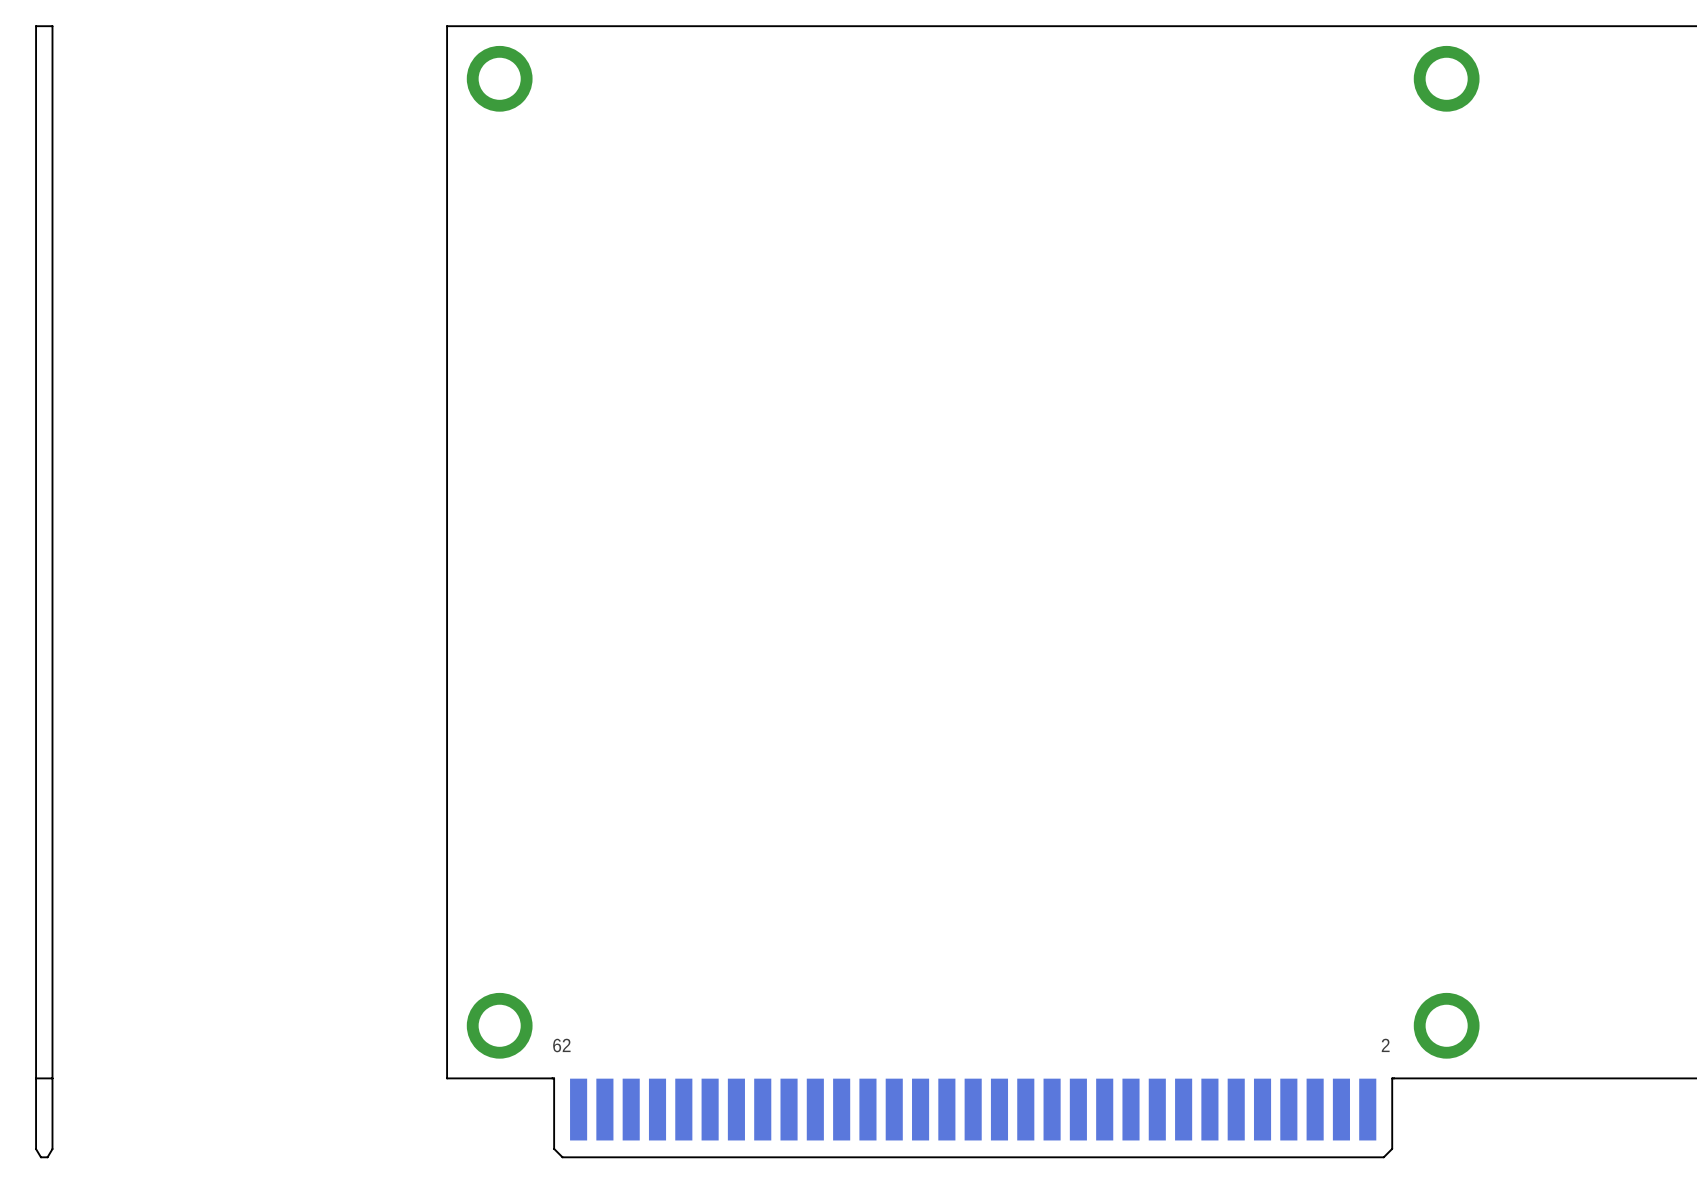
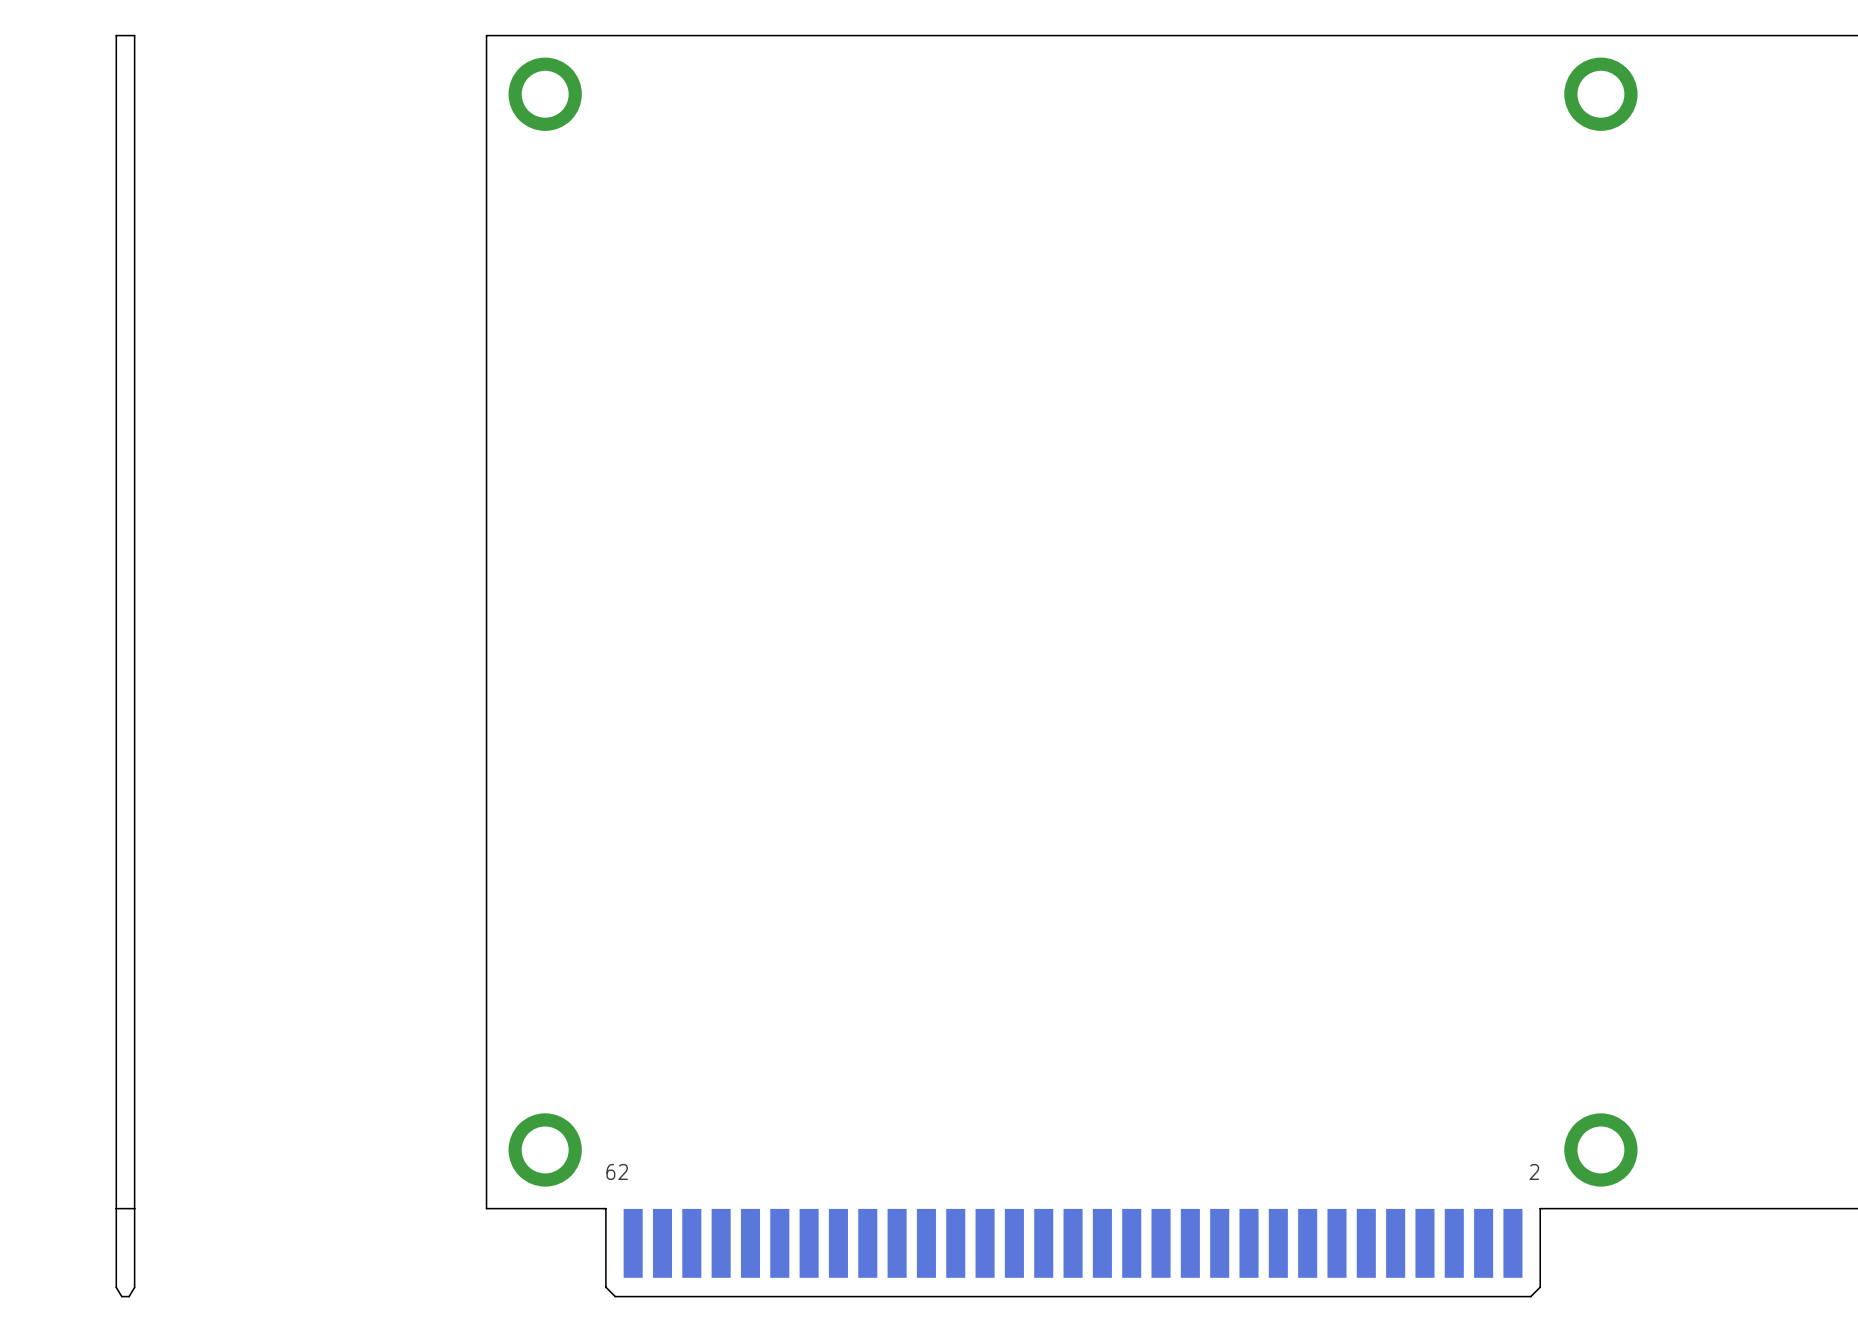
board edge: (52, 26) (52, 1149) (47, 1157) (40, 1157) (36, 1149) (36, 26) (52, 26) -> (134, 35) (134, 1287) (129, 1296) (121, 1296) (116, 1287) (116, 35) (134, 35)
board edge: (52, 1078) (36, 1078) -> (134, 1208) (116, 1208)

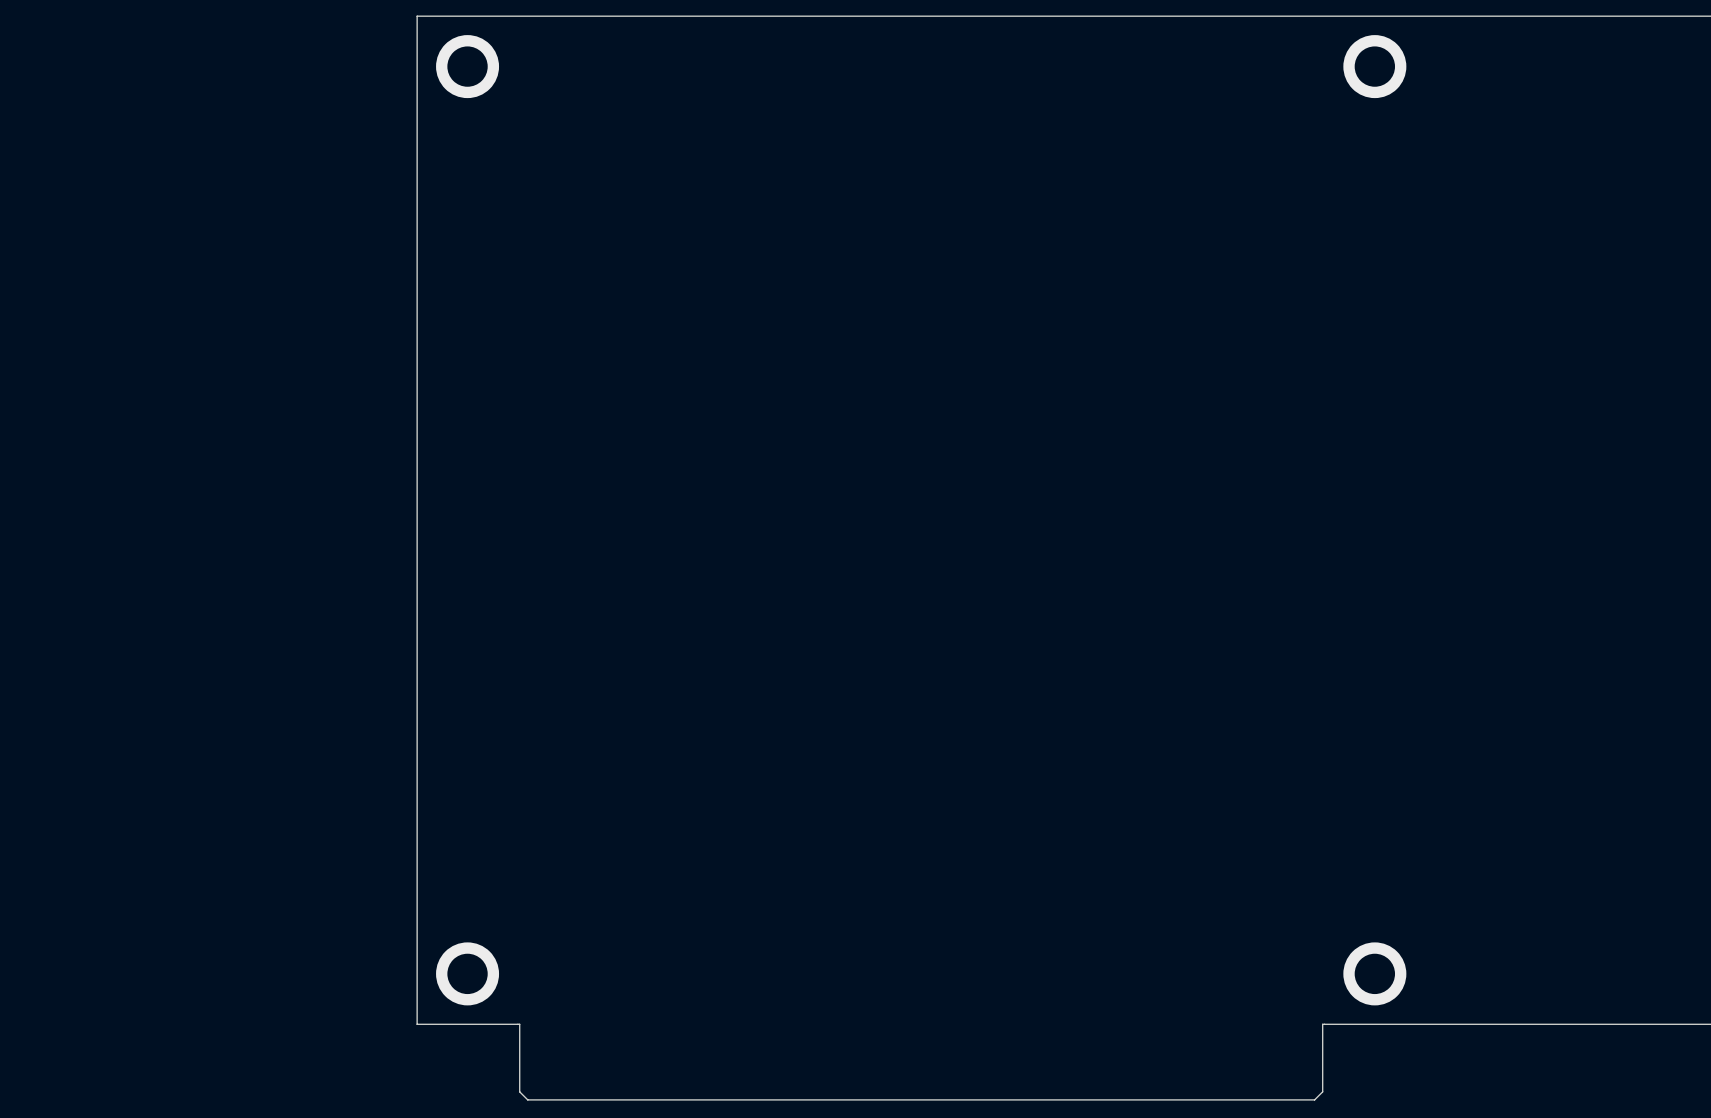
board edge: (134, 35) (116, 35) (116, 1287) (121, 1296) (129, 1296) (134, 1287) (134, 35) -> none
board edge: (134, 1208) (116, 1208) -> none
part: (1073, 1252) -> none

